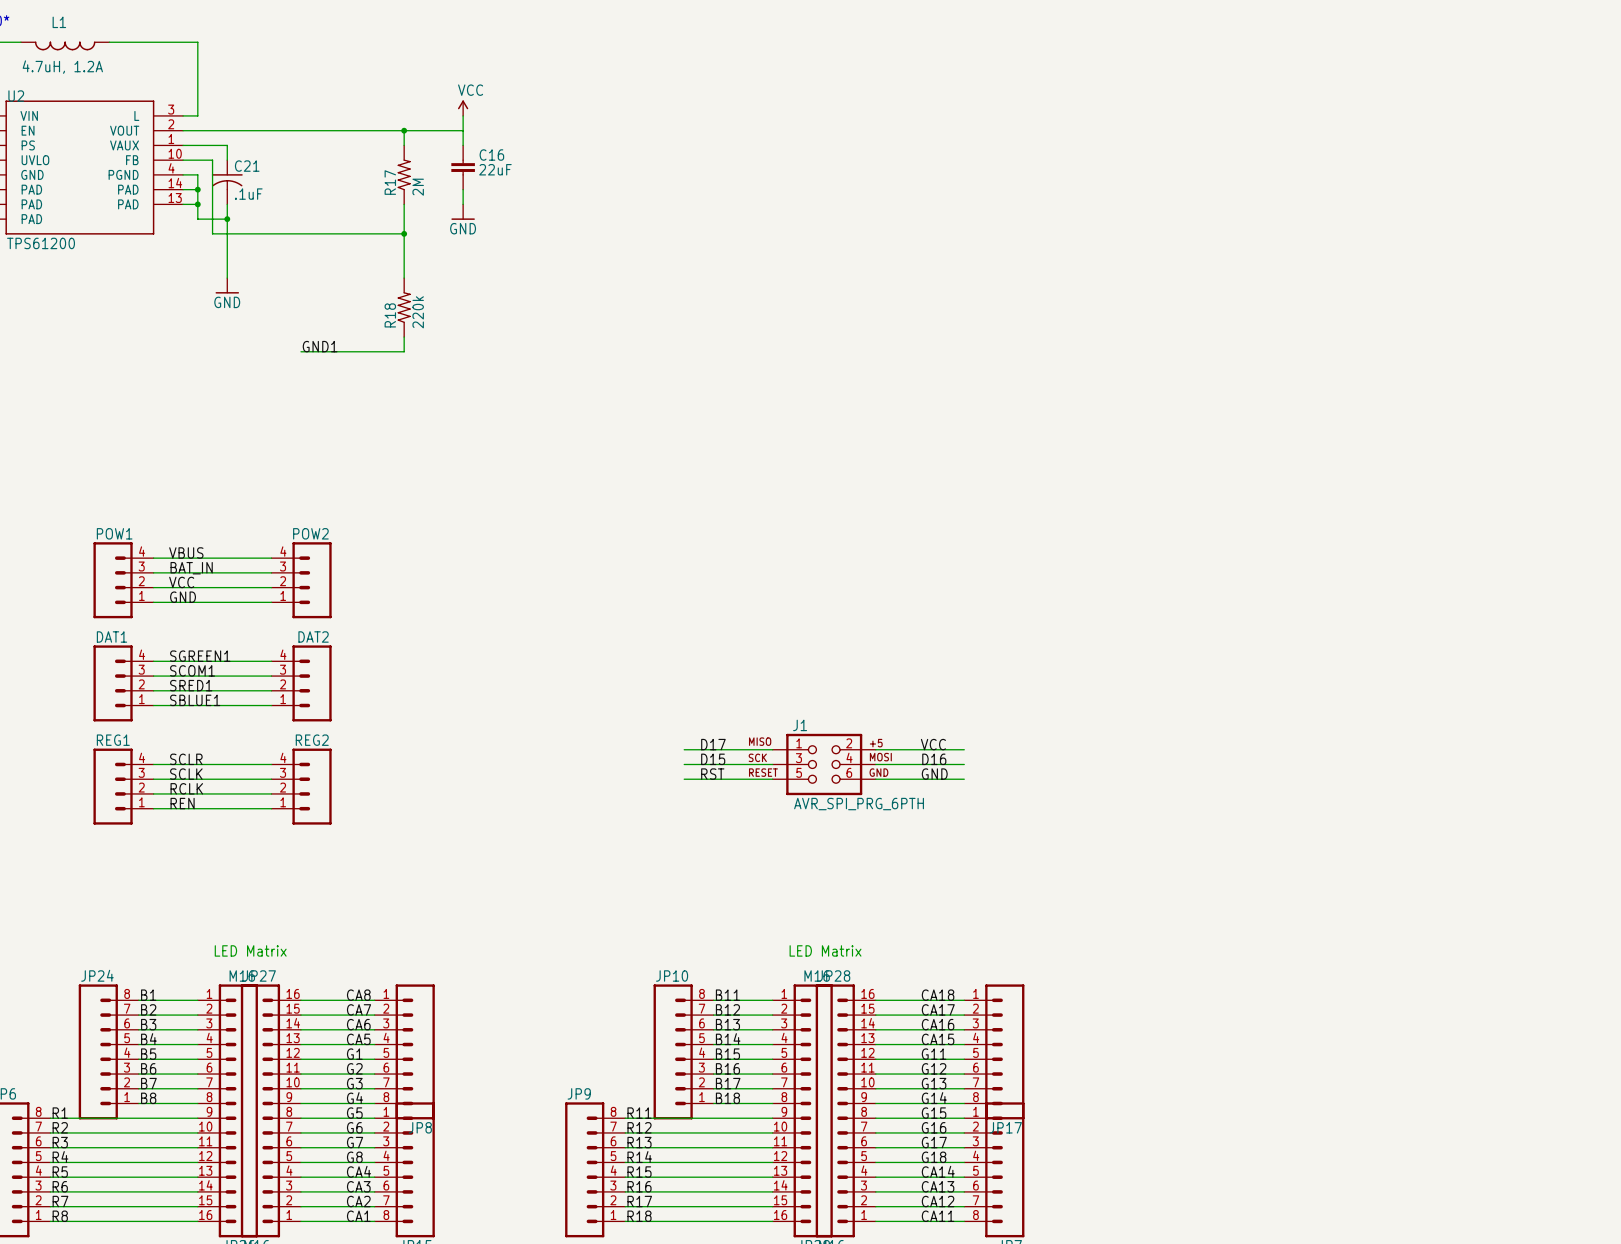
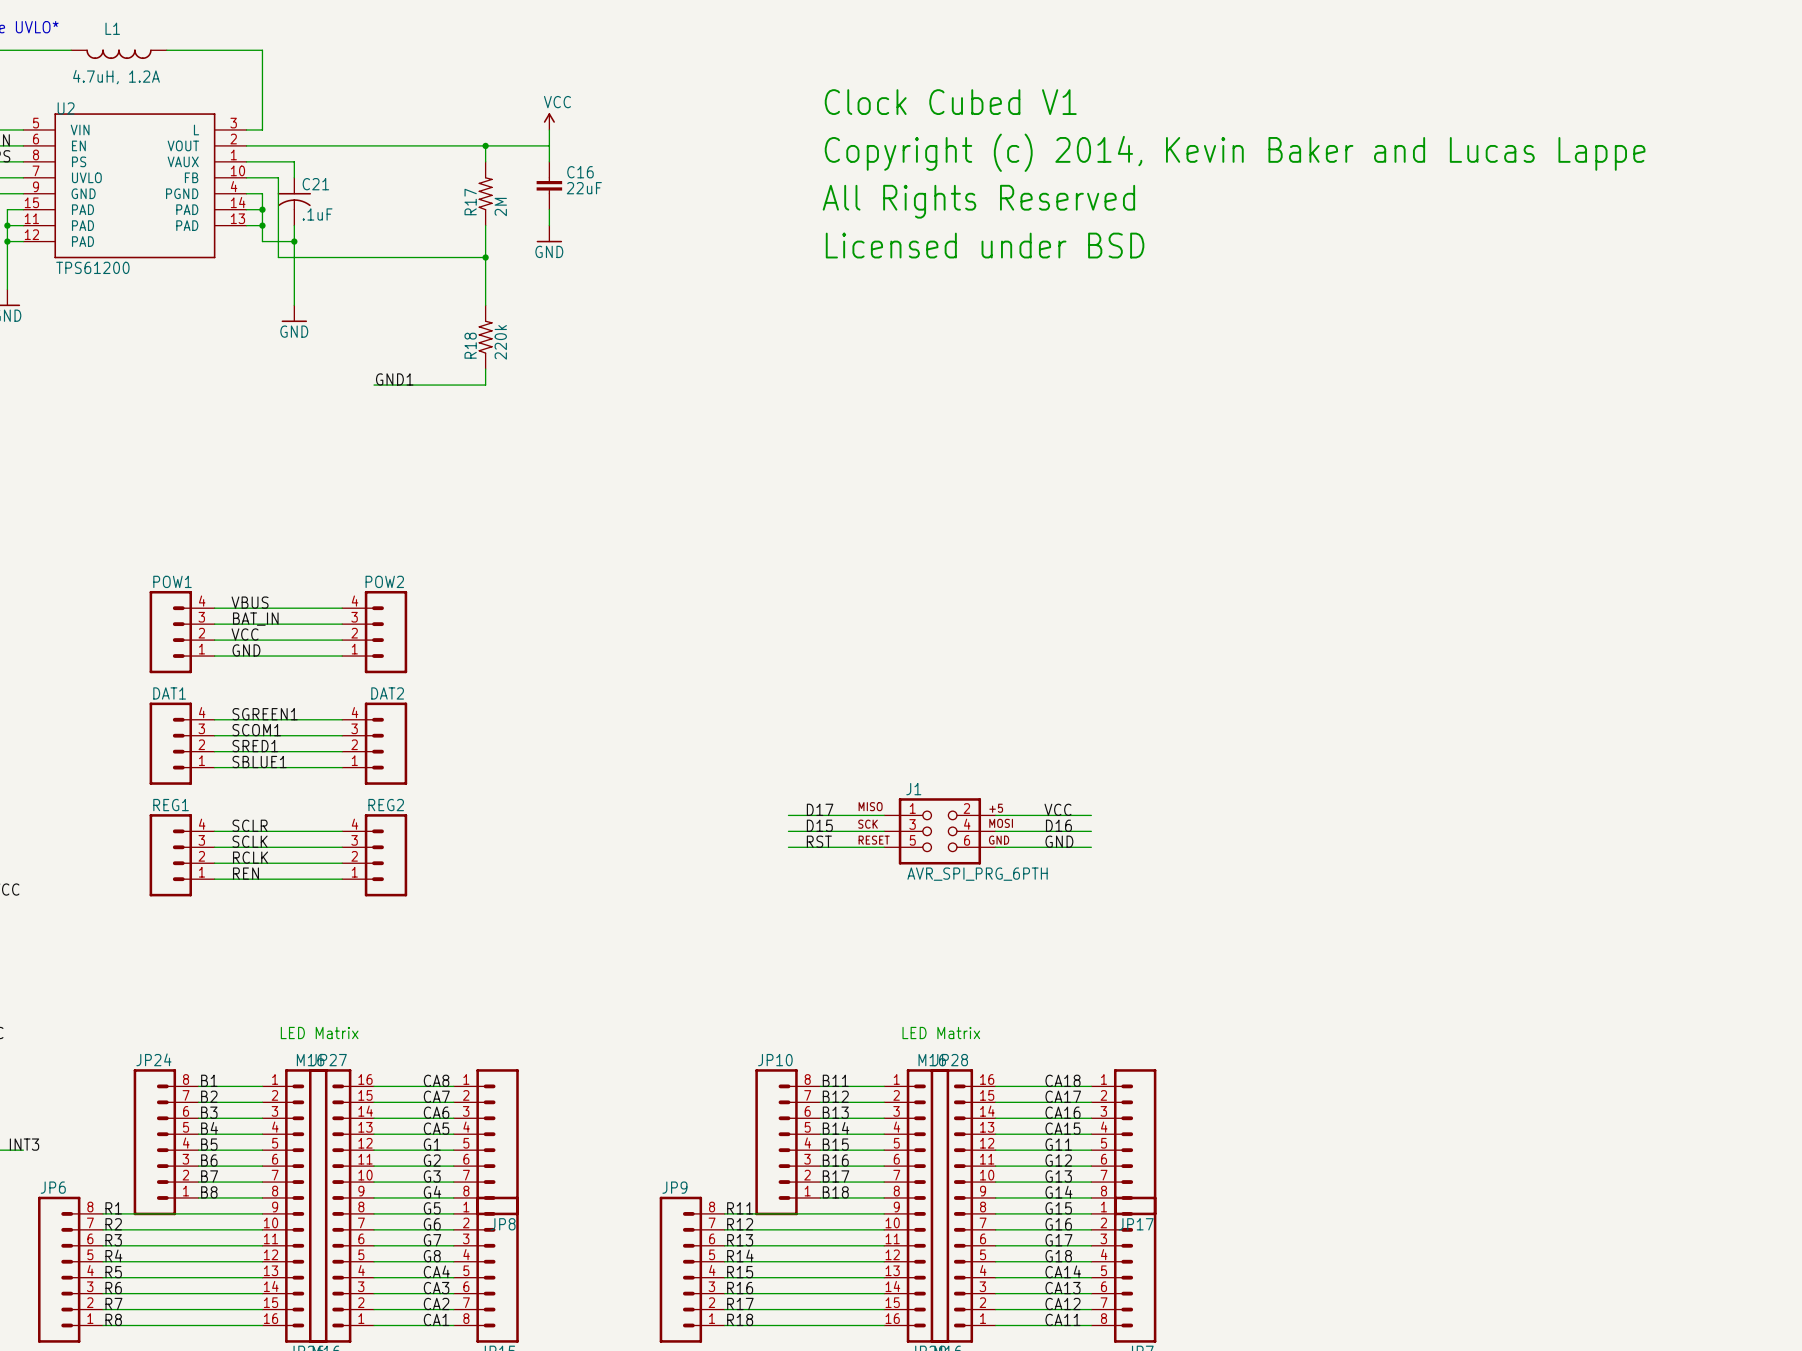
text: none -> Clock Cubed V1 (950, 102)
text: none -> Copyright (c) 2014, Kevin Baker and Lucas Lappe (1235, 152)
text: none -> All Rights Reserved (978, 201)
text: none -> Licensed under BSD (985, 245)

